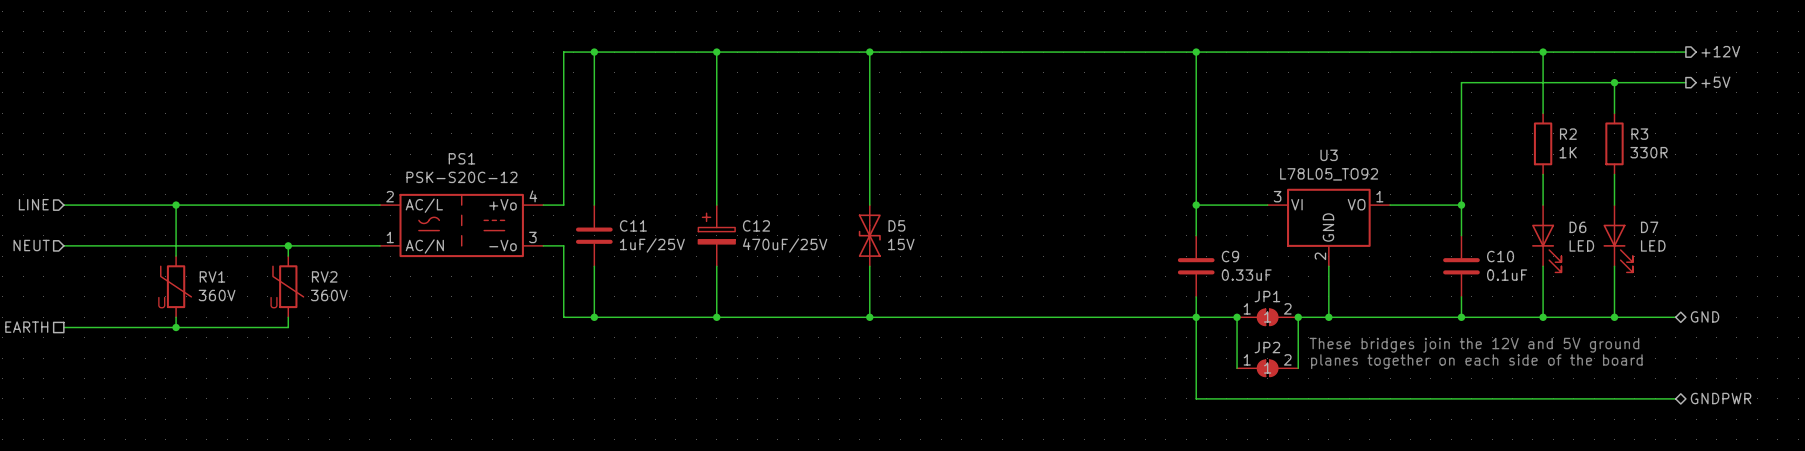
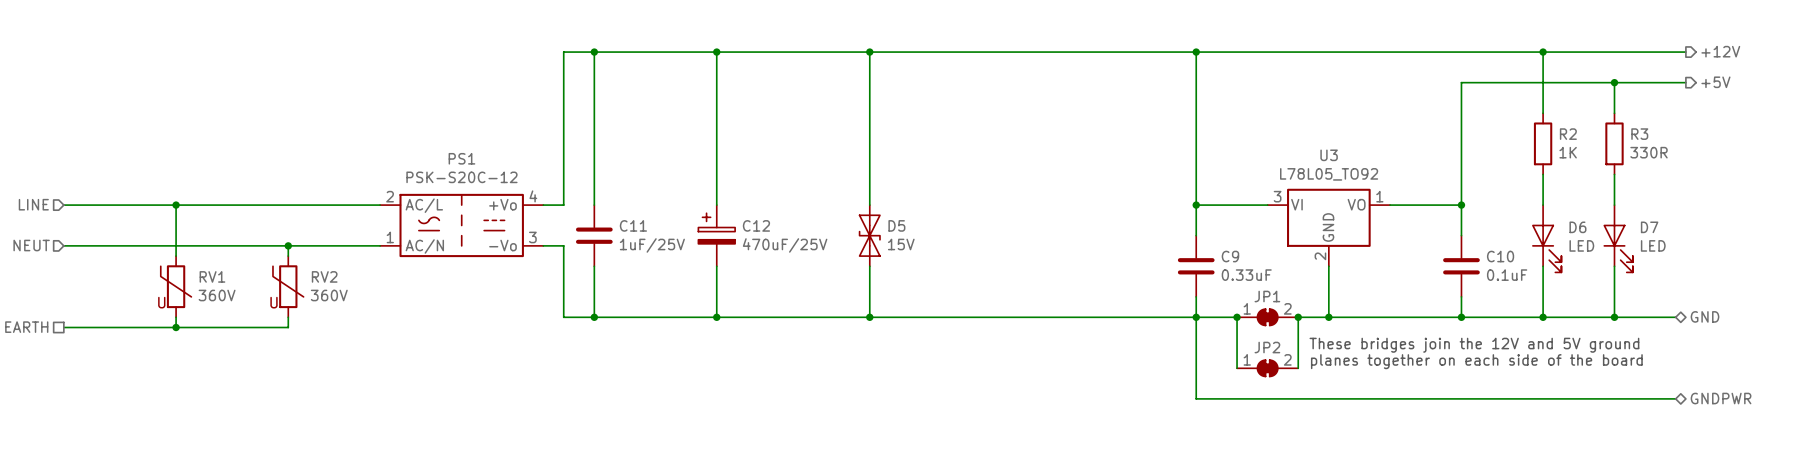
JP1 text: 1 (1267, 316) -> none
JP2 text: 1 (1267, 367) -> none

